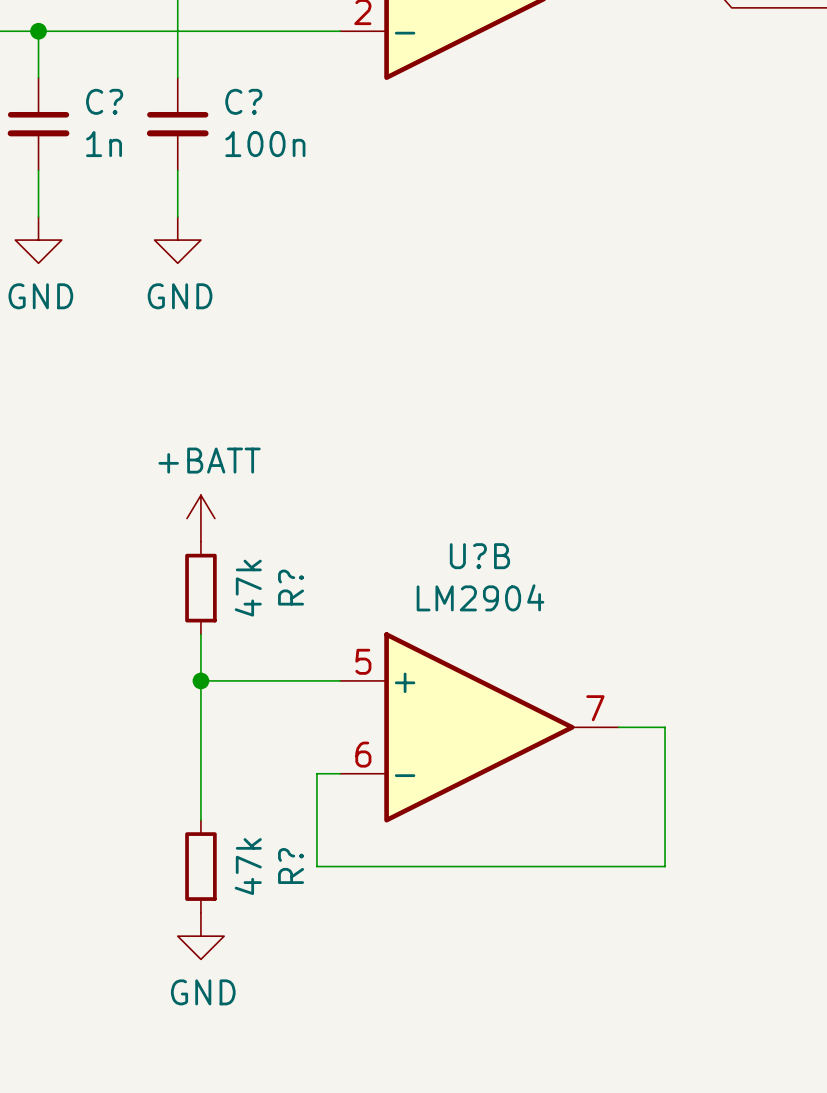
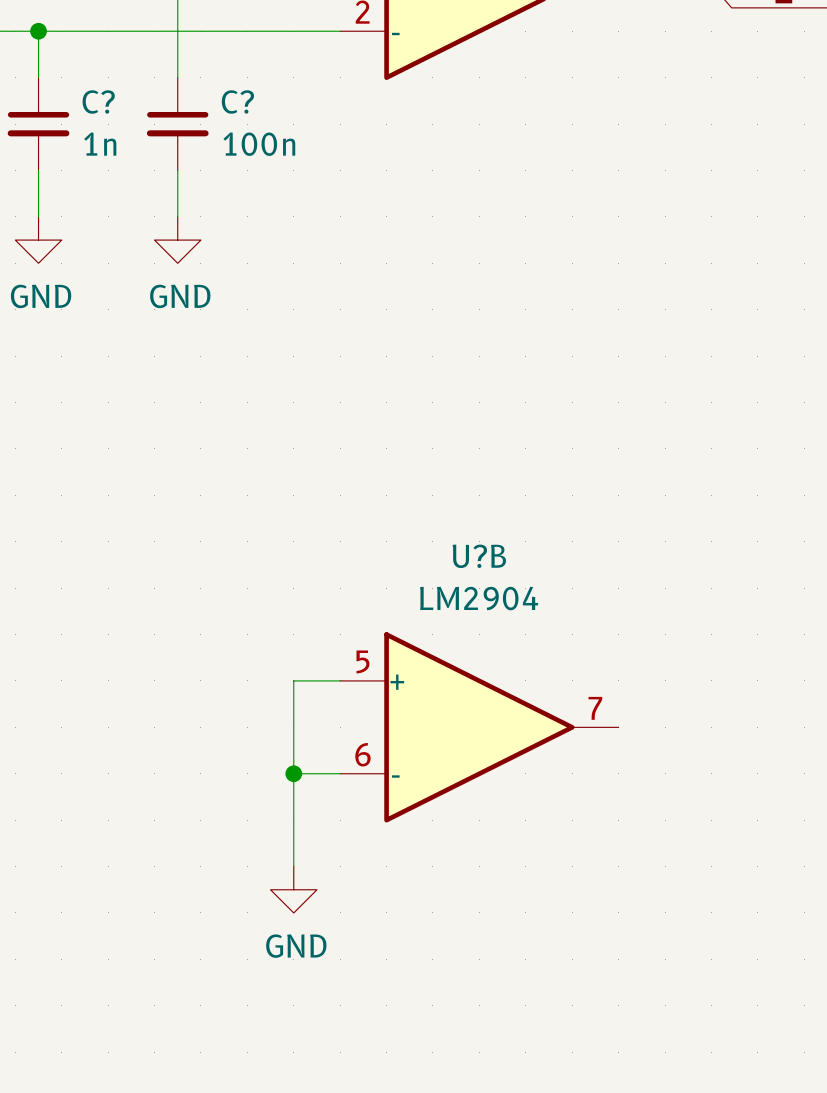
power symbol: +BATT (200, 518) -> none
R?: 47k (200, 588) -> none
wire: (200, 634) (200, 820) -> none
wire: (200, 680) (293, 680) -> (293, 866) (293, 680)
junction: (200, 680) -> none
wire: (618, 727) (665, 727) (665, 866) (316, 866) (316, 773) -> (293, 773) (316, 773)
junction: none -> (293, 773)
R?: 47k (200, 866) -> none
power symbol position: GND (200, 936) -> GND (293, 889)

